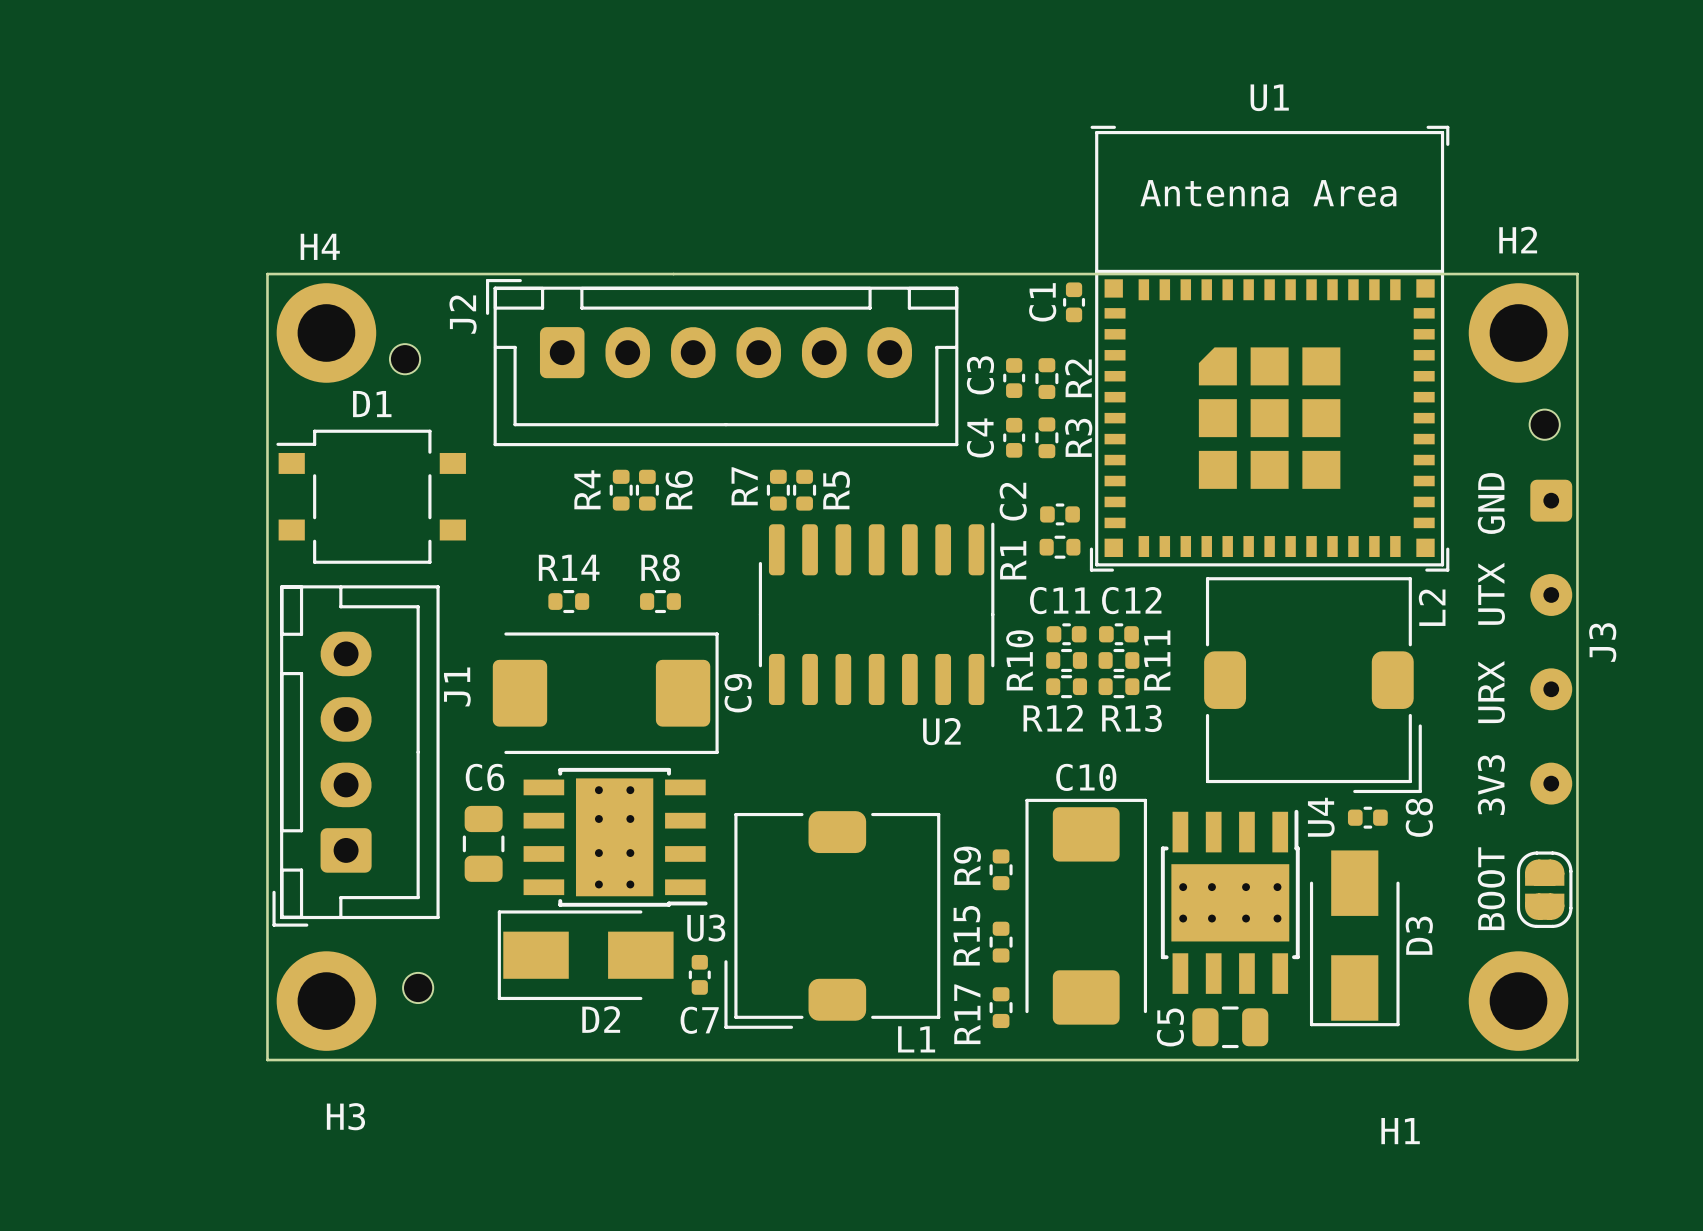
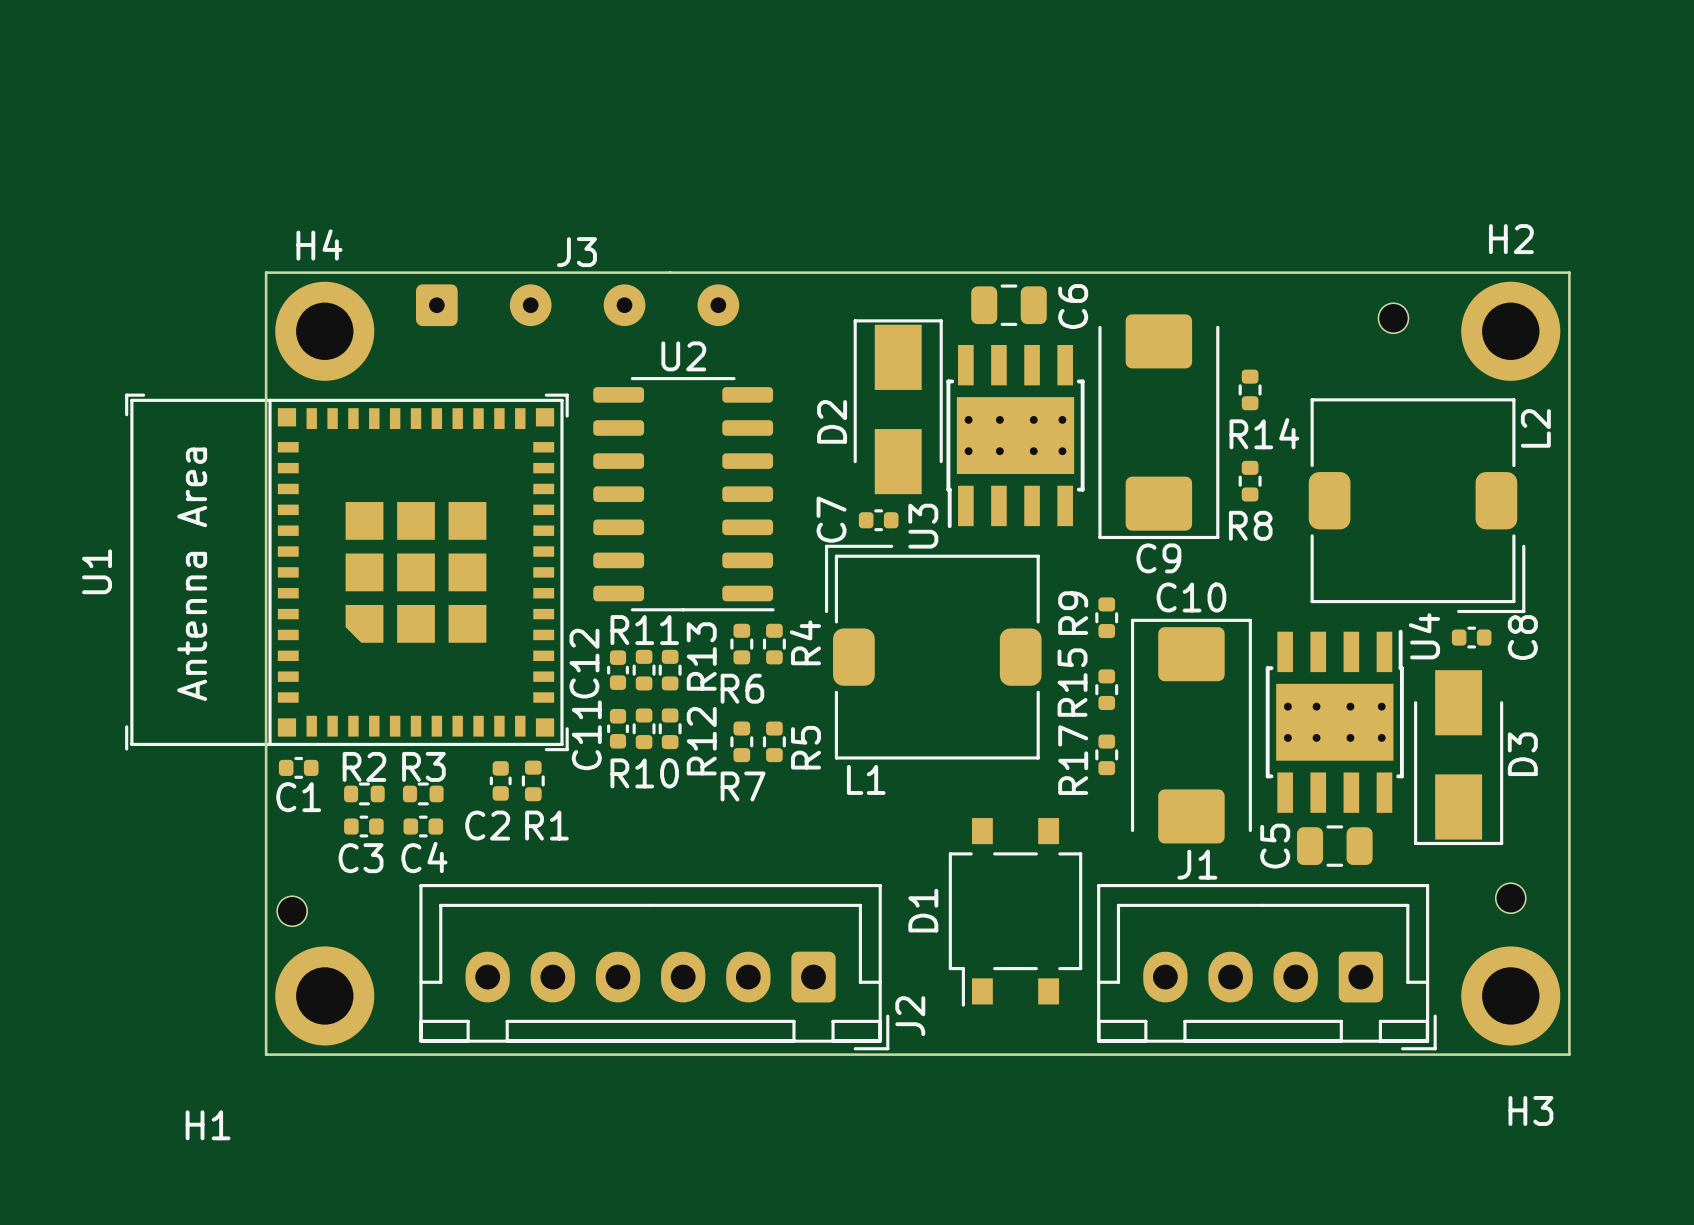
C1 rotation: 0° (1074, 302) -> 90° clockwise (298, 767)
C1 position: (1074, 302) -> (298, 767)
U1 rotation: 0° (1269, 348) -> 90° counterclockwise (346, 572)
U1 position: (1269, 348) -> (346, 572)
part: (405, 359) -> none
J2 rotation: 0° (722, 362) -> 180° (654, 967)
J2 position: (722, 362) -> (654, 967)
C3 rotation: 0° (1014, 378) -> 90° clockwise (363, 826)
C3 position: (1014, 378) -> (363, 826)
R2 rotation: 0° (1046, 378) -> 90° clockwise (364, 793)
R2 position: (1046, 378) -> (364, 793)
part position: (1544, 424) -> (1393, 318)
C4 rotation: 0° (1014, 437) -> 90° clockwise (423, 826)
C4 position: (1014, 437) -> (423, 826)
R3 rotation: 0° (1046, 437) -> 90° clockwise (423, 793)
R3 position: (1046, 437) -> (423, 793)
R7 name rotation: 0° (744, 486) -> 90° clockwise (743, 786)
R4 name position: R4 (587, 489) -> R4 (805, 642)
R4 position: (621, 490) -> (774, 644)
R6 position: (647, 490) -> (741, 644)
R6 name rotation: 0° (679, 490) -> 90° clockwise (742, 688)
R7 position: (778, 490) -> (741, 741)
R5 position: (804, 490) -> (774, 741)
R5 name position: R5 (836, 490) -> R5 (806, 747)
D1 rotation: 0° (371, 496) -> 90° counterclockwise (1015, 912)
D1 position: (371, 496) -> (1015, 912)
C2 name position: C2 (1013, 501) -> C2 (487, 825)
text: GND (1491, 503) -> none
C2 rotation: 0° (1060, 514) -> 90° clockwise (500, 780)
C2 position: (1060, 514) -> (500, 780)
R1 rotation: 0° (1060, 547) -> 90° clockwise (533, 780)
R1 position: (1060, 547) -> (533, 780)
R1 name position: R1 (1013, 560) -> R1 (546, 825)
R8 name position: R8 (660, 567) -> R8 (1250, 525)
text: UTX (1491, 593) -> none
R14 rotation: 0° (568, 601) -> 90° clockwise (1250, 389)
R14 position: (568, 601) -> (1250, 389)
R8 rotation: 0° (660, 601) -> 90° clockwise (1250, 481)
R8 position: (660, 601) -> (1250, 481)
U2 rotation: 0° (876, 613) -> 90° clockwise (683, 494)
U2 position: (876, 613) -> (683, 494)
C11 rotation: 0° (1066, 634) -> 90° clockwise (618, 728)
C11 position: (1066, 634) -> (618, 728)
C12 rotation: 0° (1118, 634) -> 90° clockwise (618, 670)
C12 position: (1118, 634) -> (618, 670)
J3 rotation: 0° (1551, 642) -> 90° counterclockwise (577, 305)
J3 position: (1551, 642) -> (577, 305)
R10 name position: R10 (1019, 660) -> R10 (644, 773)
R12 rotation: 0° (1066, 660) -> 90° clockwise (644, 728)
R12 position: (1066, 660) -> (644, 728)
R13 rotation: 0° (1118, 660) -> 90° clockwise (644, 670)
R13 position: (1118, 660) -> (644, 670)
R11 name position: R11 (1157, 660) -> R11 (644, 630)
L2 position: (1312, 685) -> (1417, 505)
R10 rotation: 0° (1066, 686) -> 90° clockwise (670, 728)
R10 position: (1066, 686) -> (670, 728)
R11 rotation: 0° (1118, 686) -> 90° clockwise (670, 670)
R11 position: (1118, 686) -> (670, 670)
text: URX (1491, 692) -> none
C9 rotation: 0° (605, 693) -> 90° clockwise (1158, 426)
C9 position: (605, 693) -> (1158, 426)
R12 name position: R12 (1053, 718) -> R12 (701, 741)
R13 name position: R13 (1131, 718) -> R13 (701, 656)
U2 name position: U2 (941, 731) -> U2 (683, 356)
J1 rotation: 0° (356, 755) -> 90° counterclockwise (1266, 967)
J1 position: (356, 755) -> (1266, 967)
text: 3V3 (1491, 785) -> none
C8 position: (1367, 817) -> (1471, 637)
U3 rotation: 0° (615, 837) -> 90° clockwise (1015, 436)
U3 position: (615, 837) -> (1015, 436)
C6 rotation: 0° (483, 843) -> 90° clockwise (1008, 305)
C6 position: (483, 843) -> (1008, 305)
R9 position: (1001, 869) -> (1106, 617)
part: BOOT (1544, 889) -> none
U4 position: (1230, 901) -> (1334, 721)
part: none -> (1510, 898)
C10 position: (1086, 911) -> (1191, 731)
L1 rotation: 0° (832, 919) -> 90° clockwise (933, 652)
L1 position: (832, 919) -> (933, 652)
D3 position: (1354, 938) -> (1458, 757)
R15 position: (1001, 942) -> (1106, 689)
D2 rotation: 0° (585, 955) -> 90° clockwise (898, 406)
D2 position: (585, 955) -> (898, 406)
C7 rotation: 0° (699, 974) -> 90° clockwise (878, 520)
C7 position: (699, 974) -> (878, 520)
part position: (418, 987) -> (292, 911)
R17 position: (1001, 1007) -> (1106, 754)
C5 position: (1230, 1027) -> (1334, 846)
L1 name position: L1 (916, 1039) -> L1 (866, 779)
H3 name: H3 (345, 1116) -> H1 (208, 1125)
H1 name: H1 (1400, 1131) -> H3 (1530, 1110)

